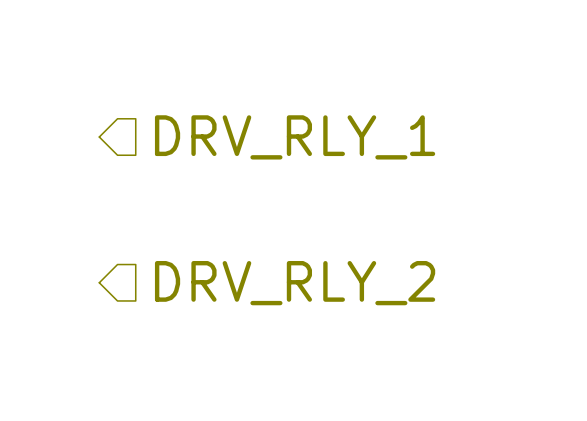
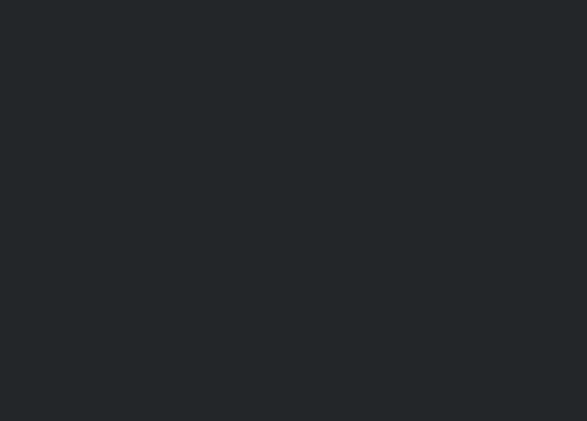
hierarchical label: DRV_RLY_1 (295, 137) -> none
hierarchical label: DRV_RLY_2 (295, 283) -> none

